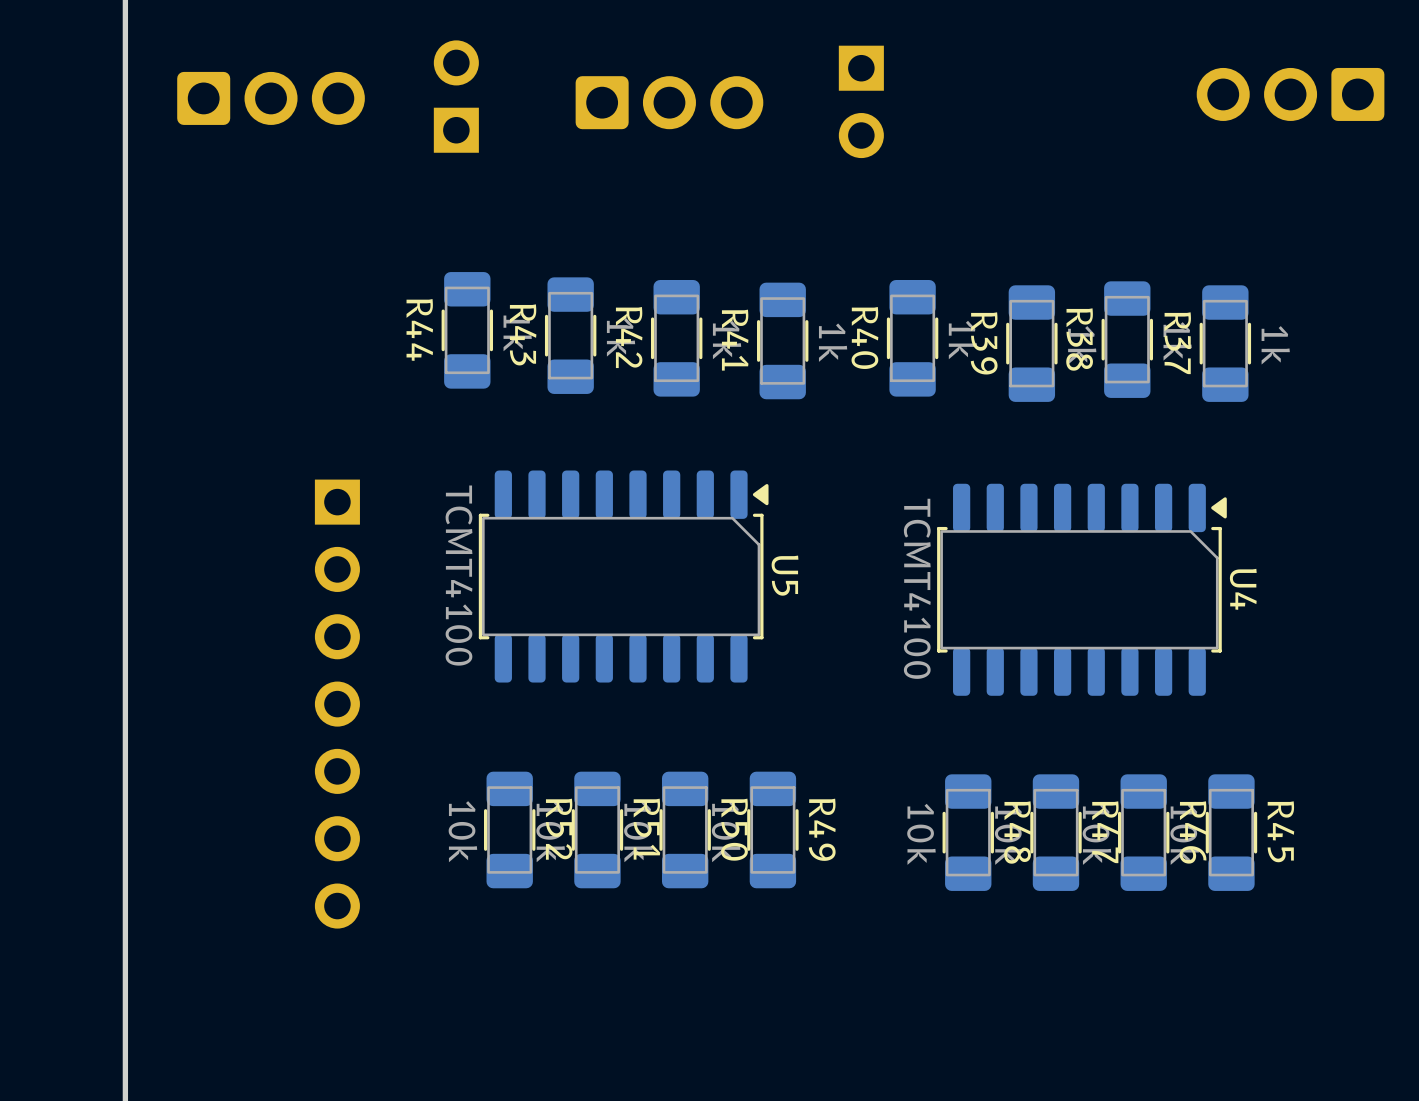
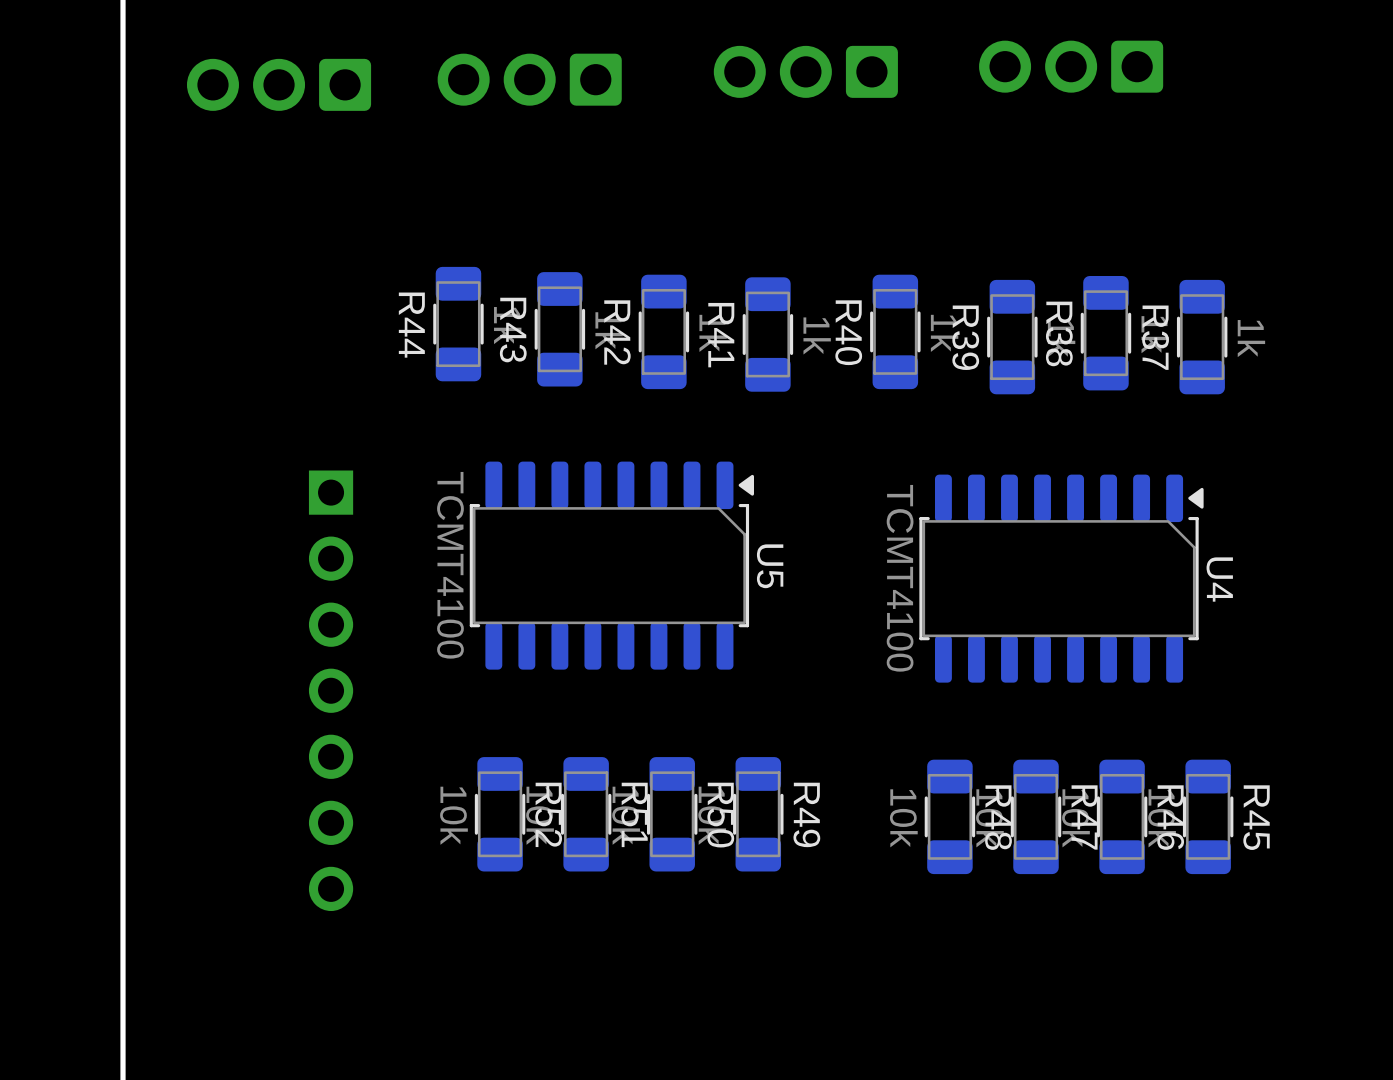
part: none -> (805, 71)
part: none -> (529, 79)
part position: (1290, 94) -> (1071, 66)
part: (456, 96) -> none
part rotation: 0° (271, 98) -> 180° (279, 84)
part: (861, 101) -> none
part: (669, 102) -> none

